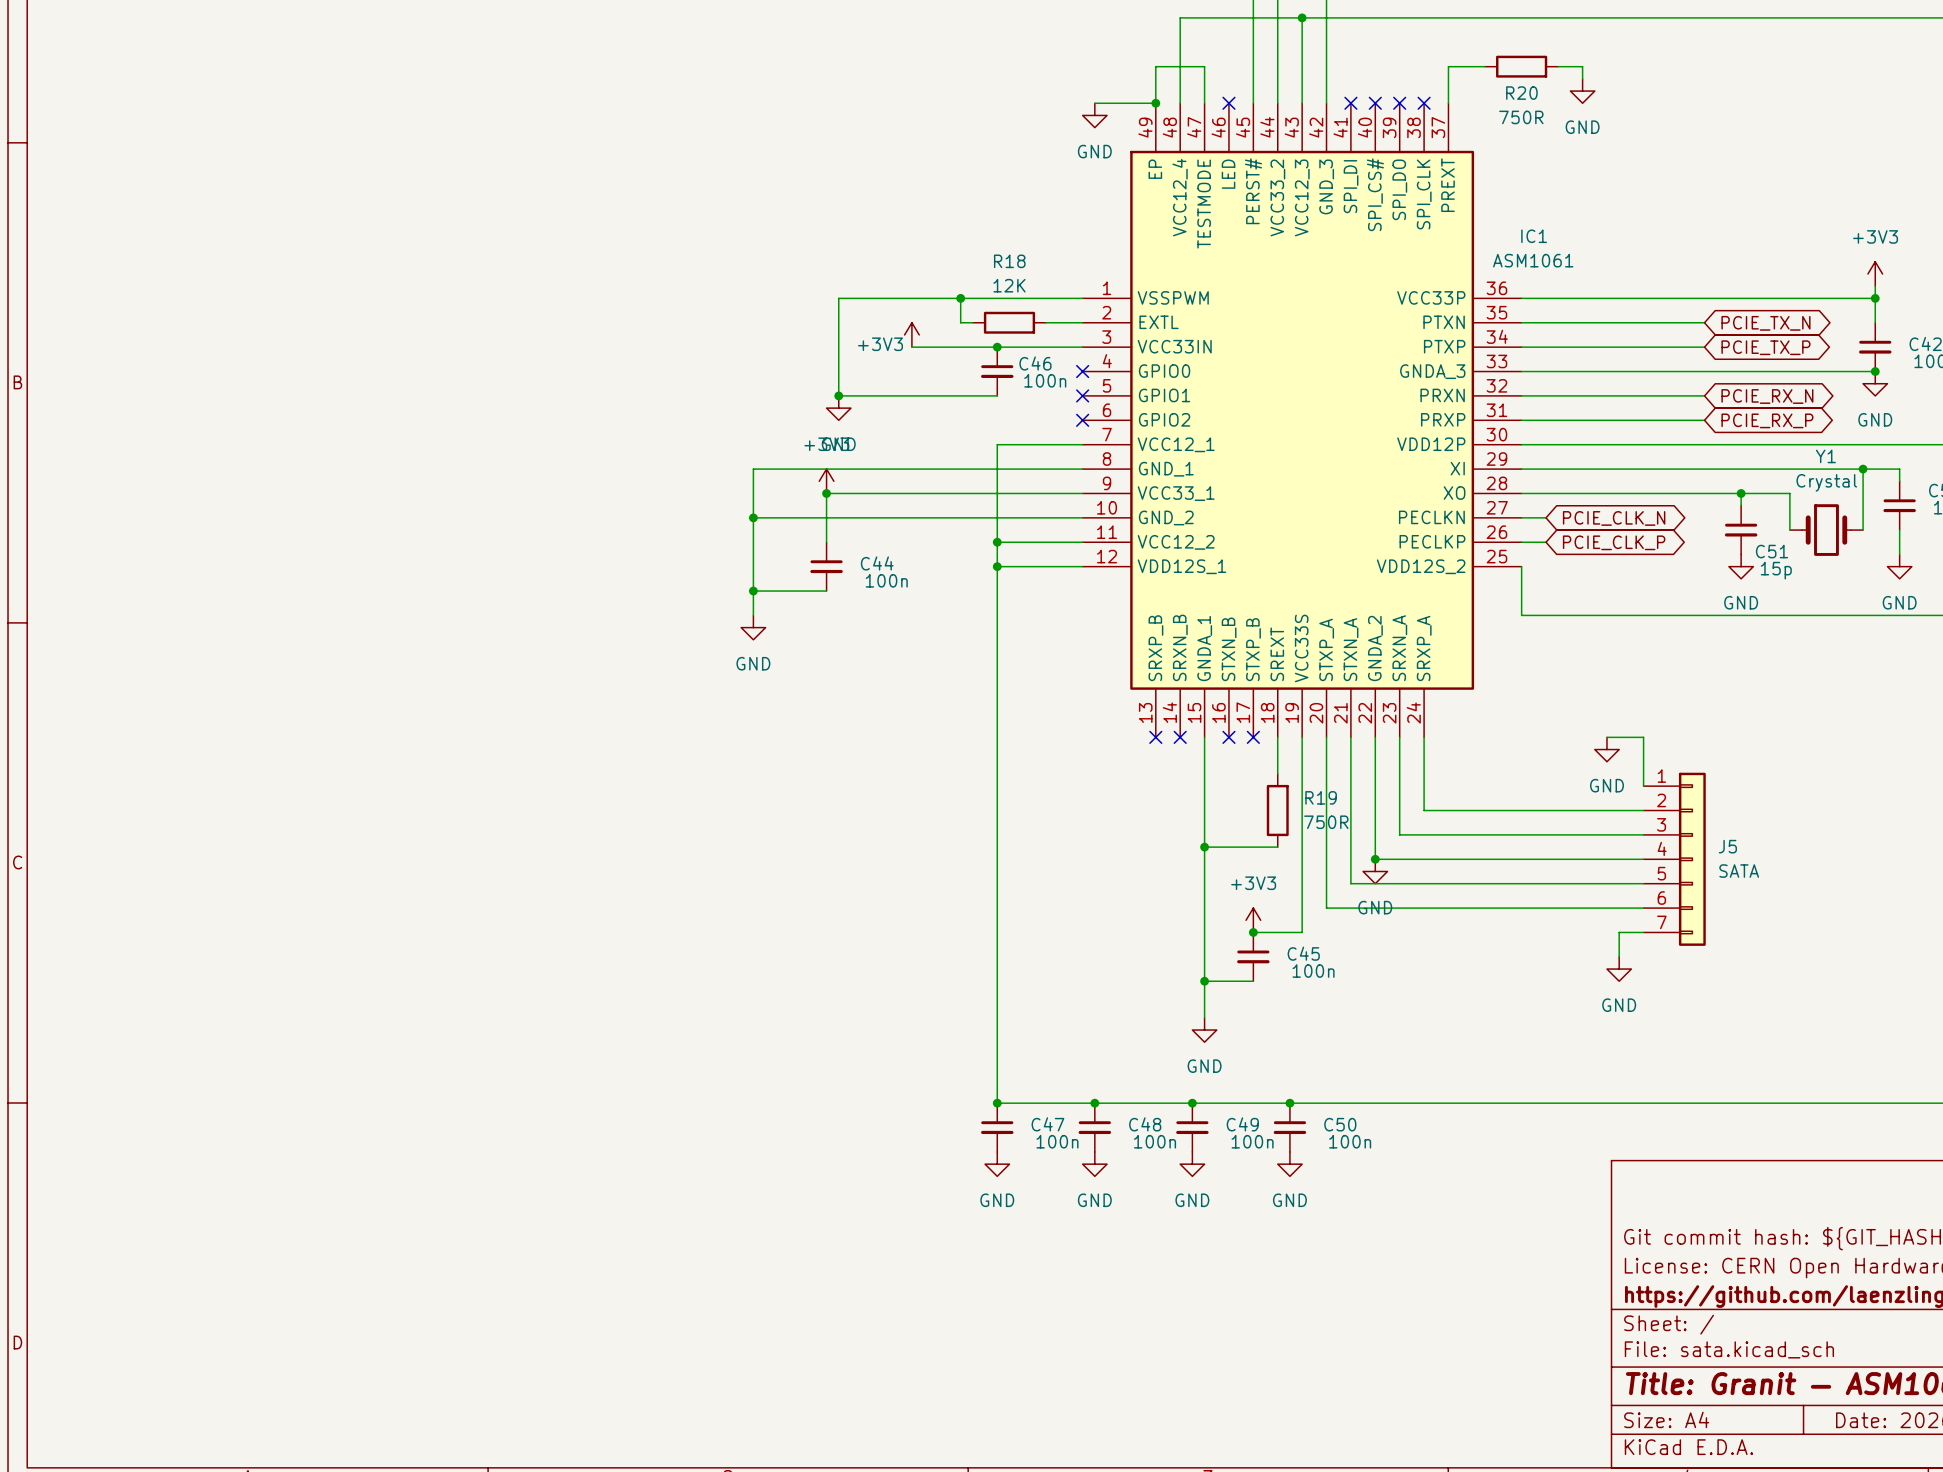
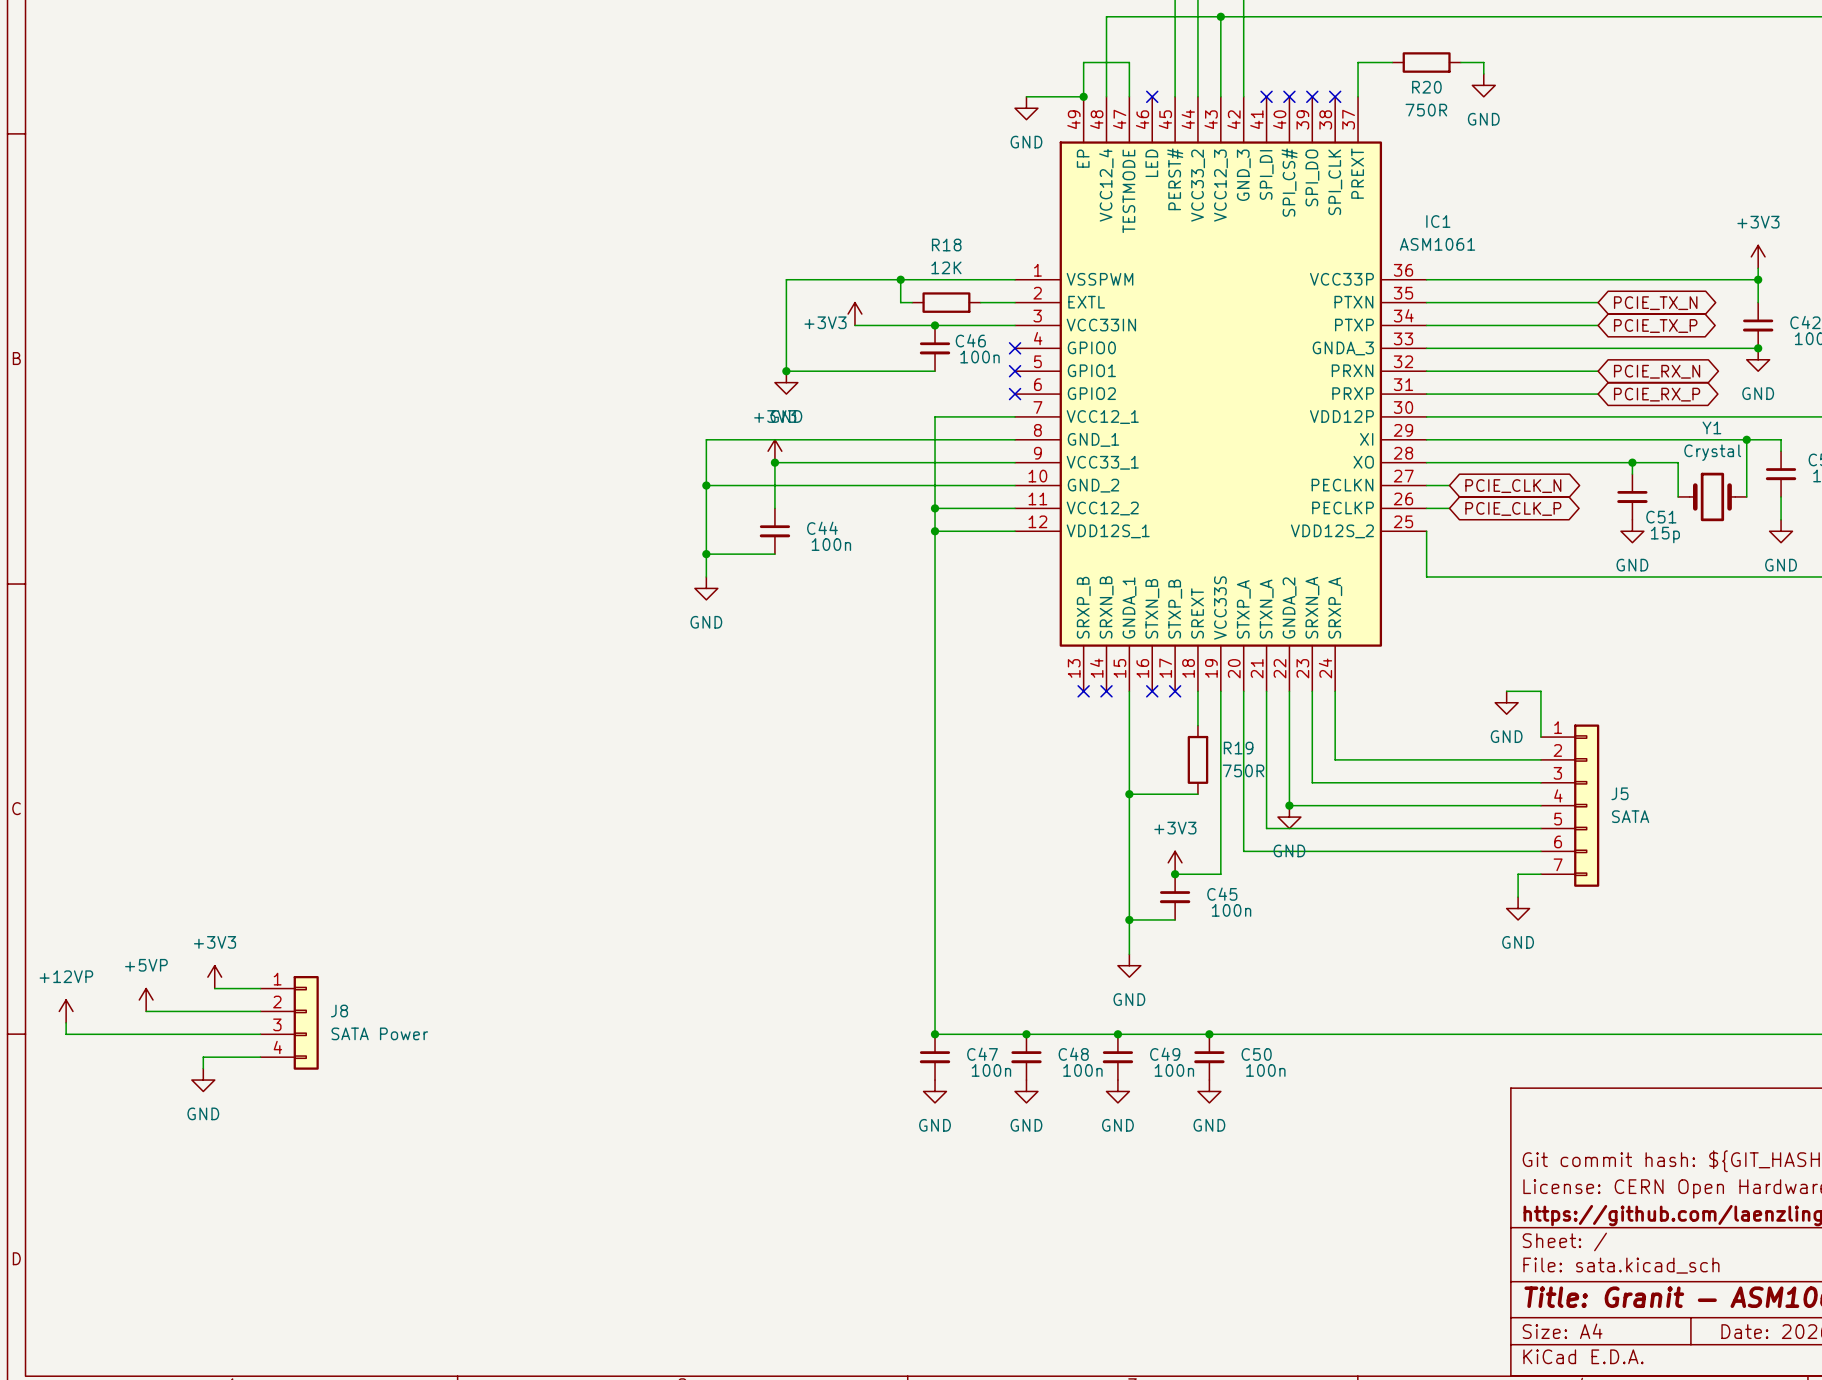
power symbol: none -> +3V3 (214, 977)
wire: none -> (214, 988) (260, 988)
power symbol: none -> +5VP (146, 1000)
power symbol: none -> +12VP (66, 1011)
wire: none -> (146, 1011) (260, 1011)
wire: none -> (66, 1022) (66, 1034) (260, 1034)
J8: none -> SATA Power (289, 1022)
wire: none -> (260, 1057) (203, 1057) (203, 1068)
power symbol: none -> GND (203, 1080)

